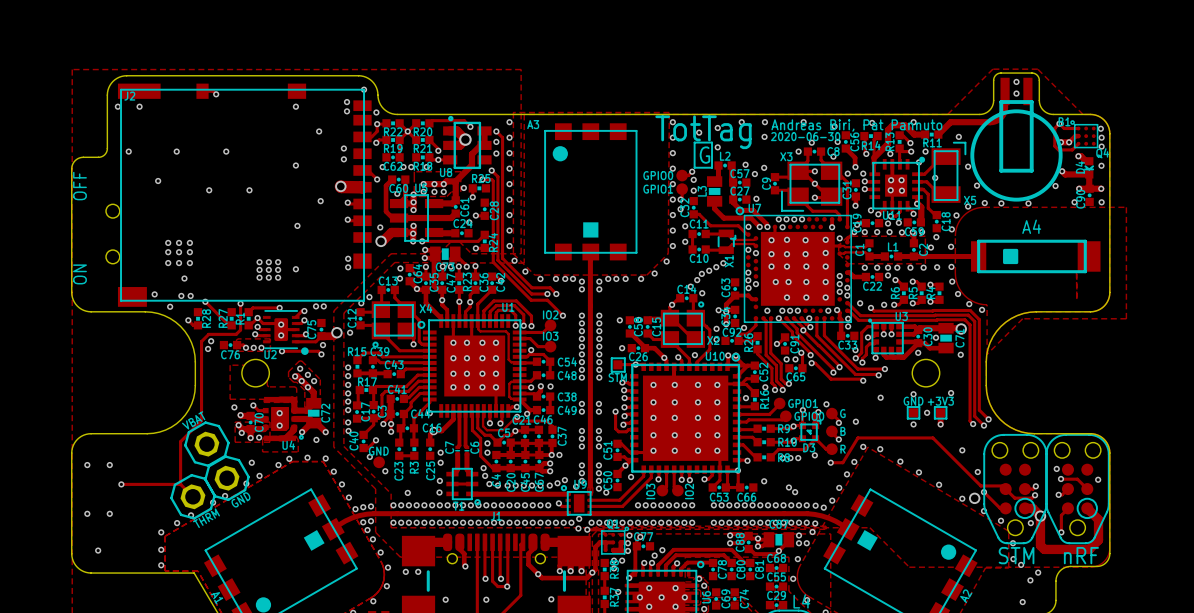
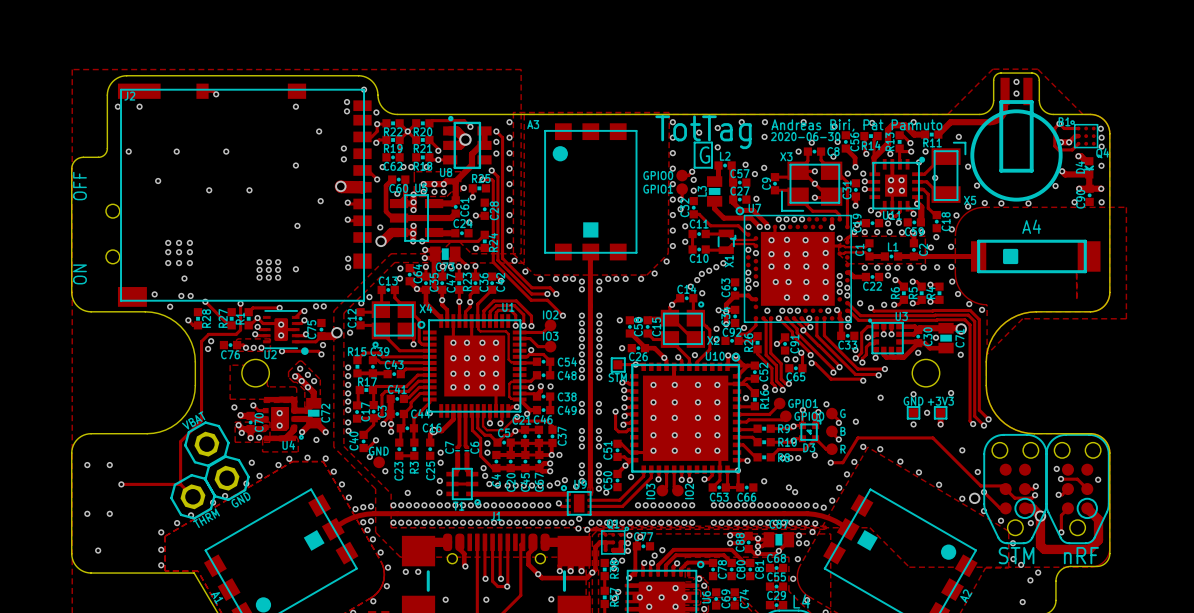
via: none -> (757, 552)
via: none -> (614, 598)

